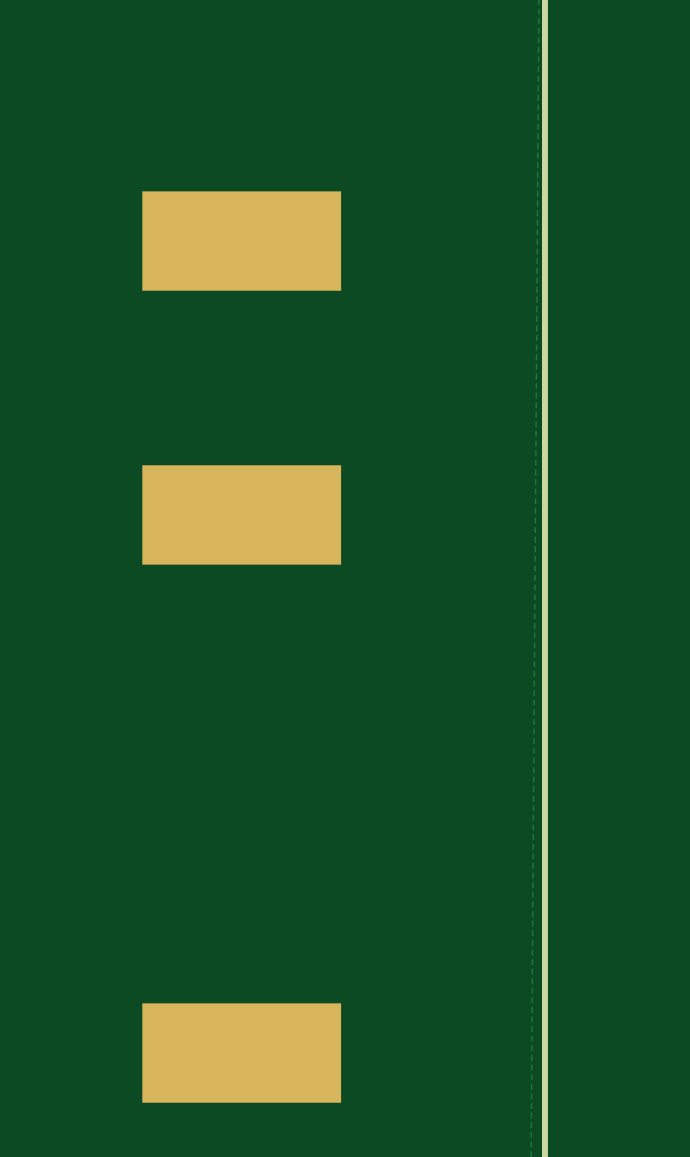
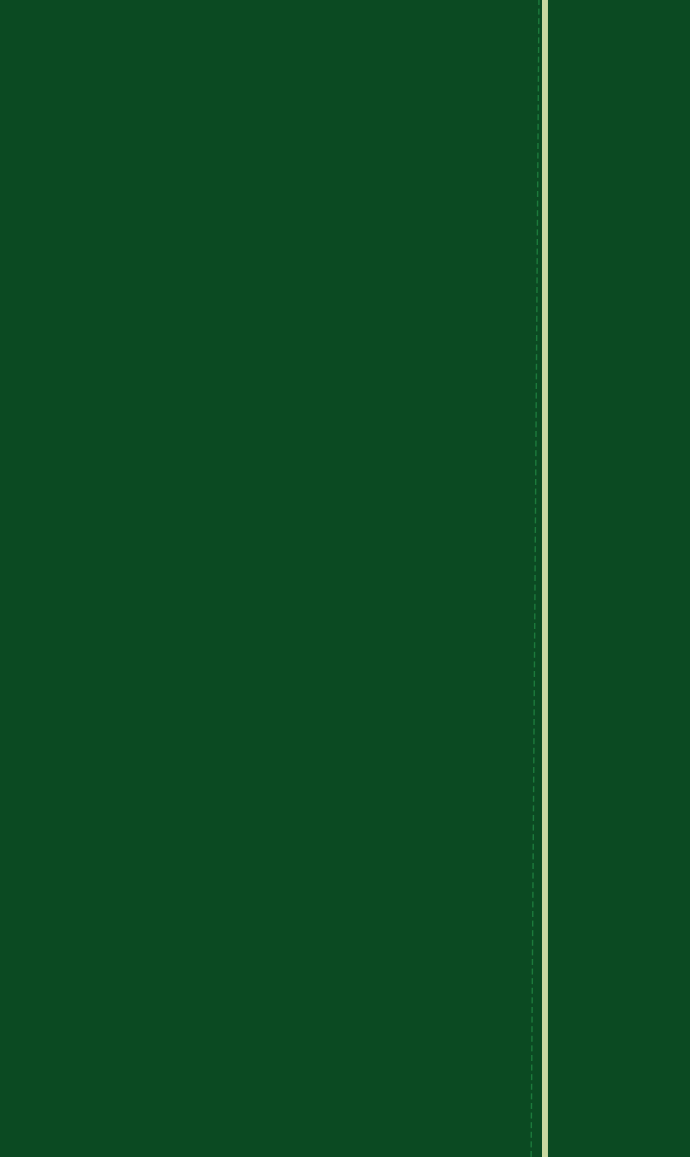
part: (241, 241) -> none
part: (241, 514) -> none
part: (241, 1053) -> none

